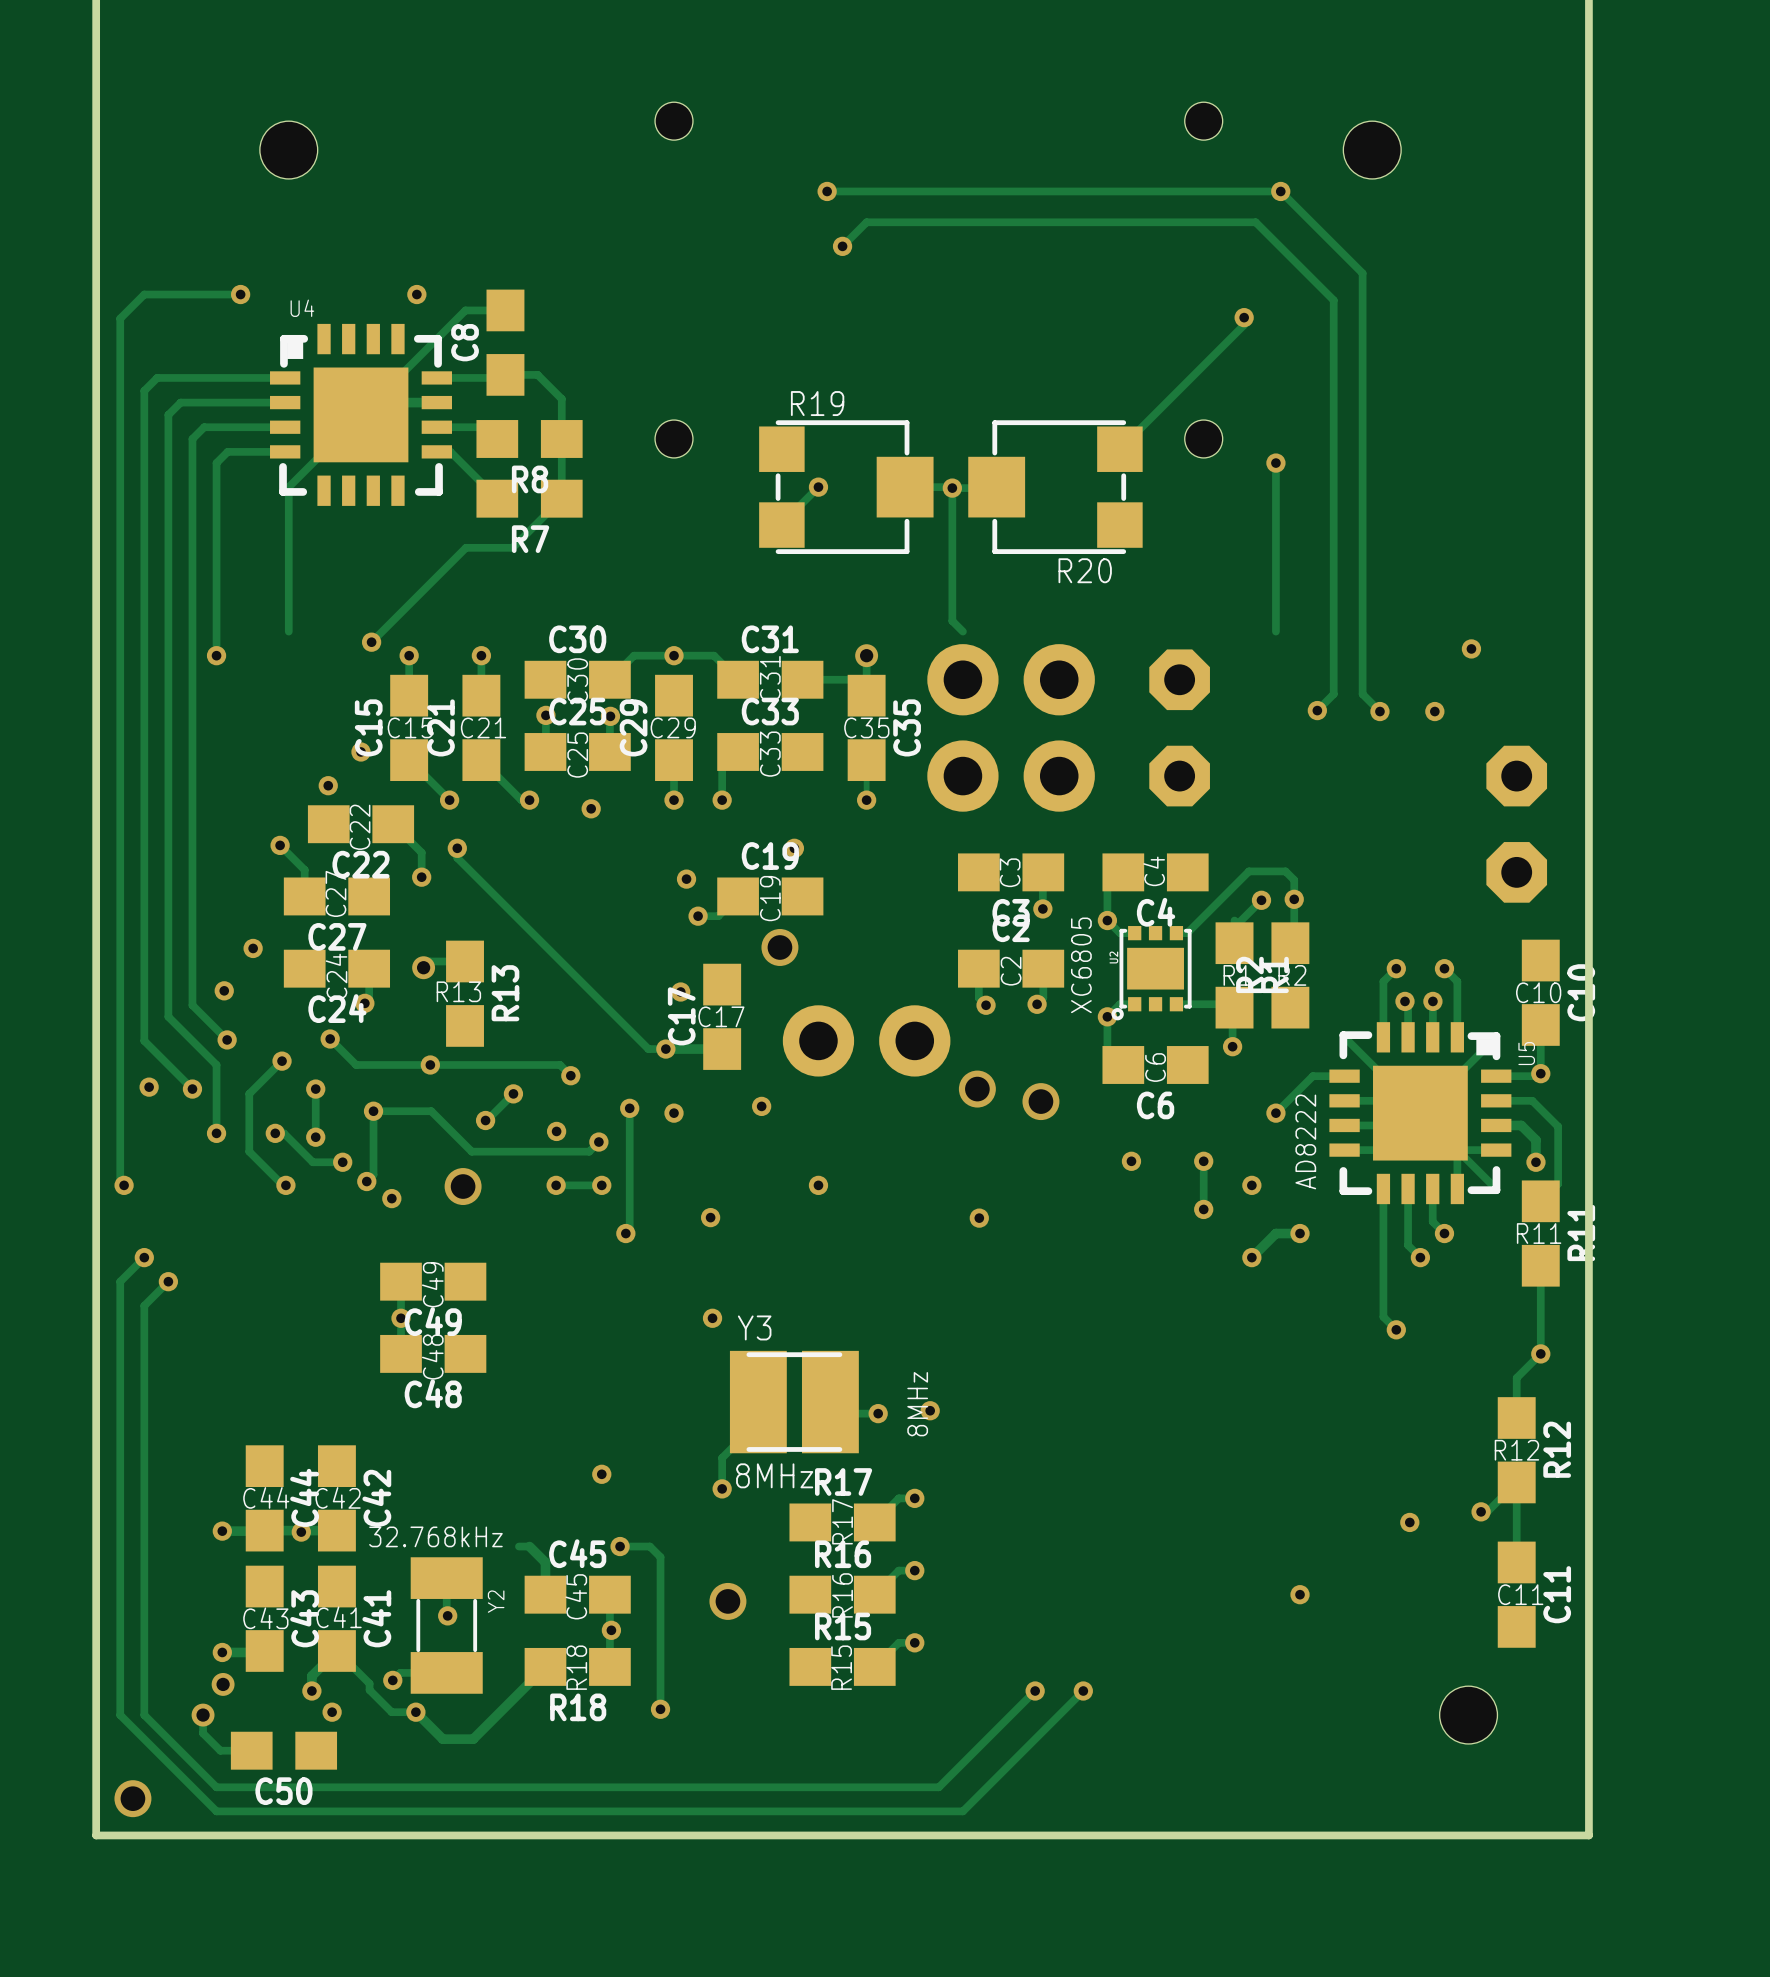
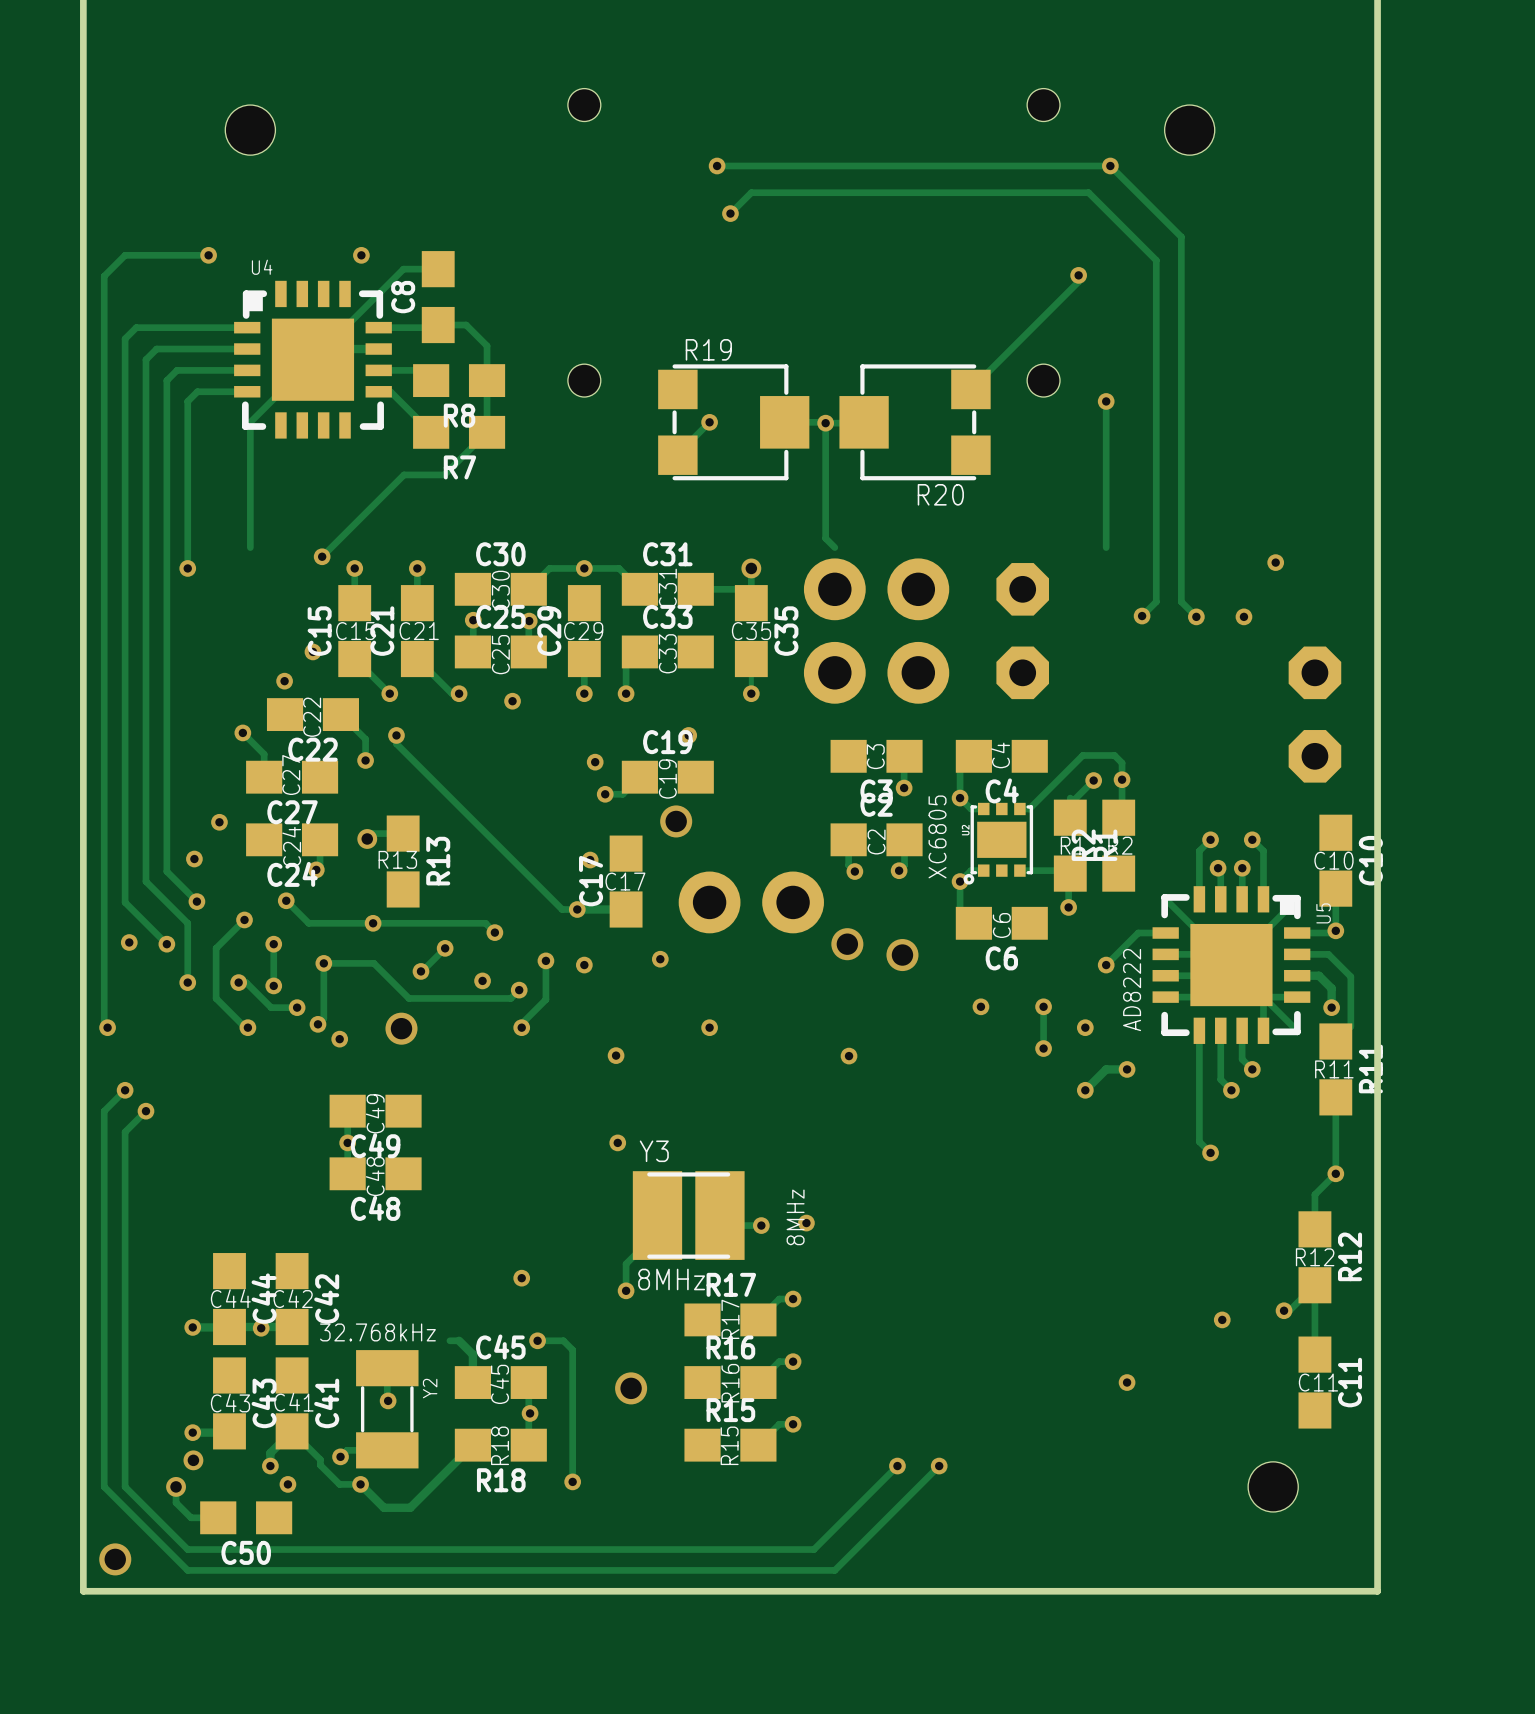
track: (629, 1153) (629, 1229) (625, 1233) -> (545, 999) (519, 1026)
via: (556, 1185) -> none
track: (601, 1185) (556, 1185) -> none
via: (625, 1233) -> none

